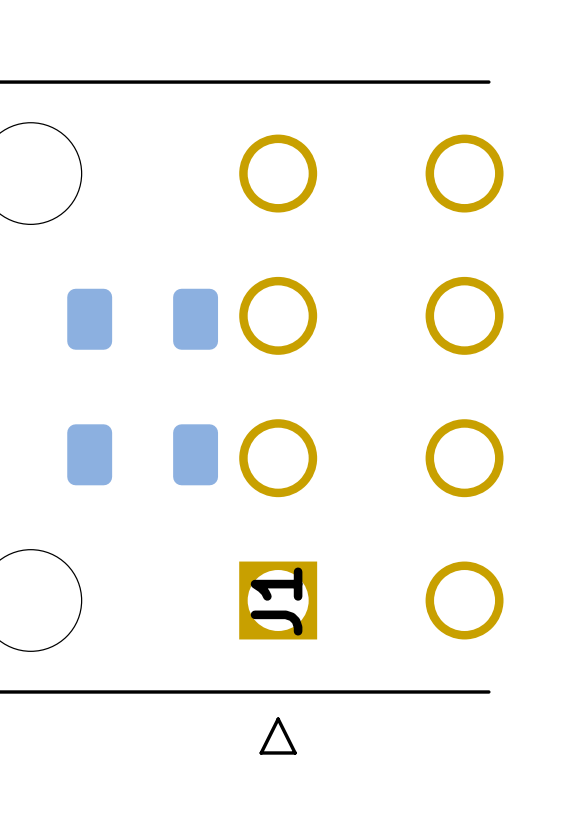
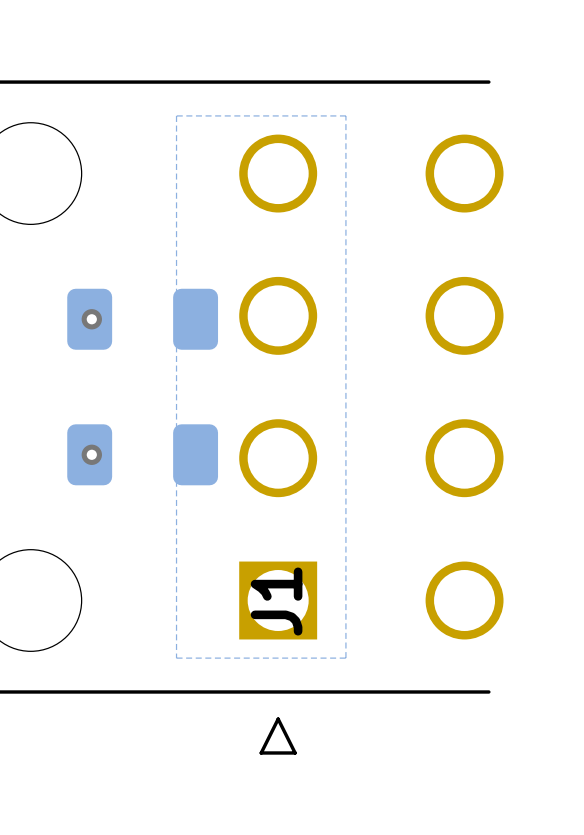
bottom zone outline: none -> (176, 115) (345, 115) (345, 658) (176, 658) (176, 115)
via: none -> (91, 319)
via: none -> (91, 454)

